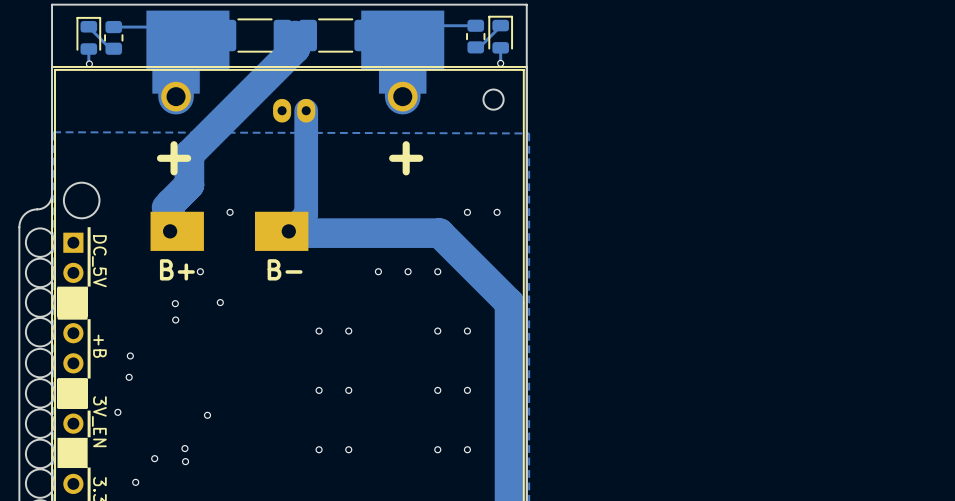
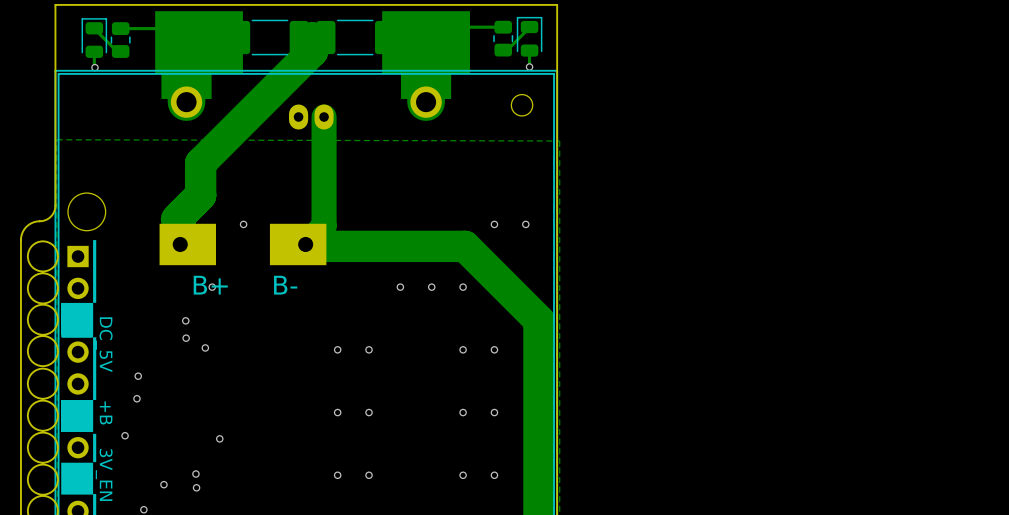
text: + (174, 158) -> none
text: + (406, 158) -> none
via position: (220, 302) -> (205, 347)

